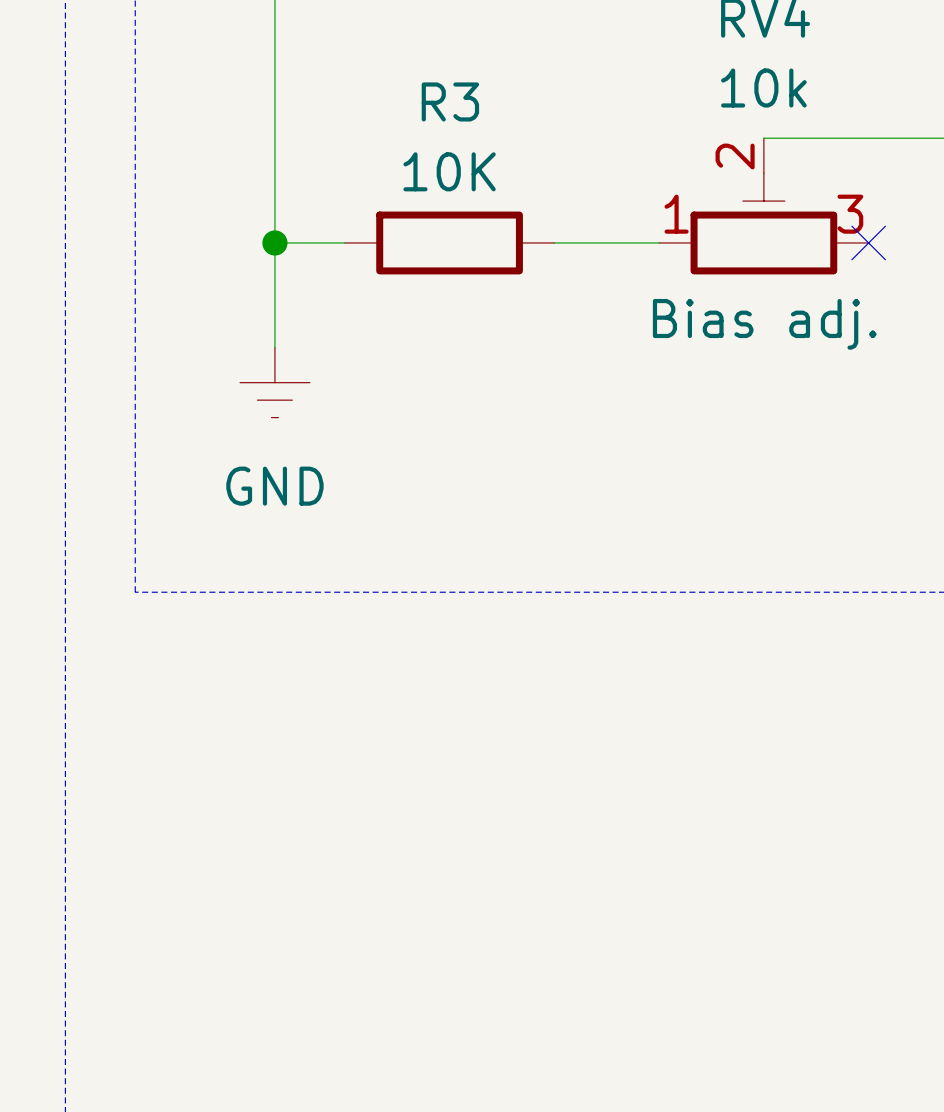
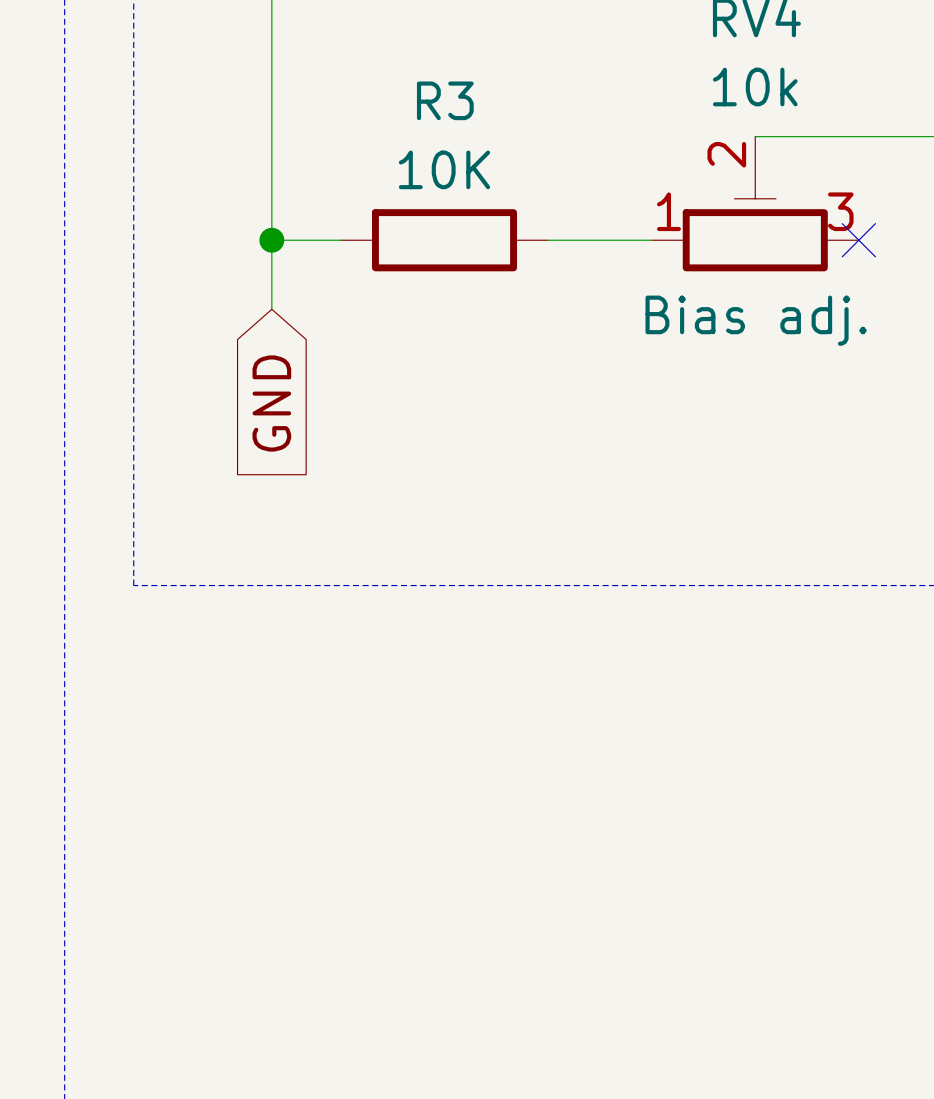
wire: (274, 312) (274, 347) -> none
power symbol: GND (274, 382) -> none
global label: none -> GND (271, 403)

